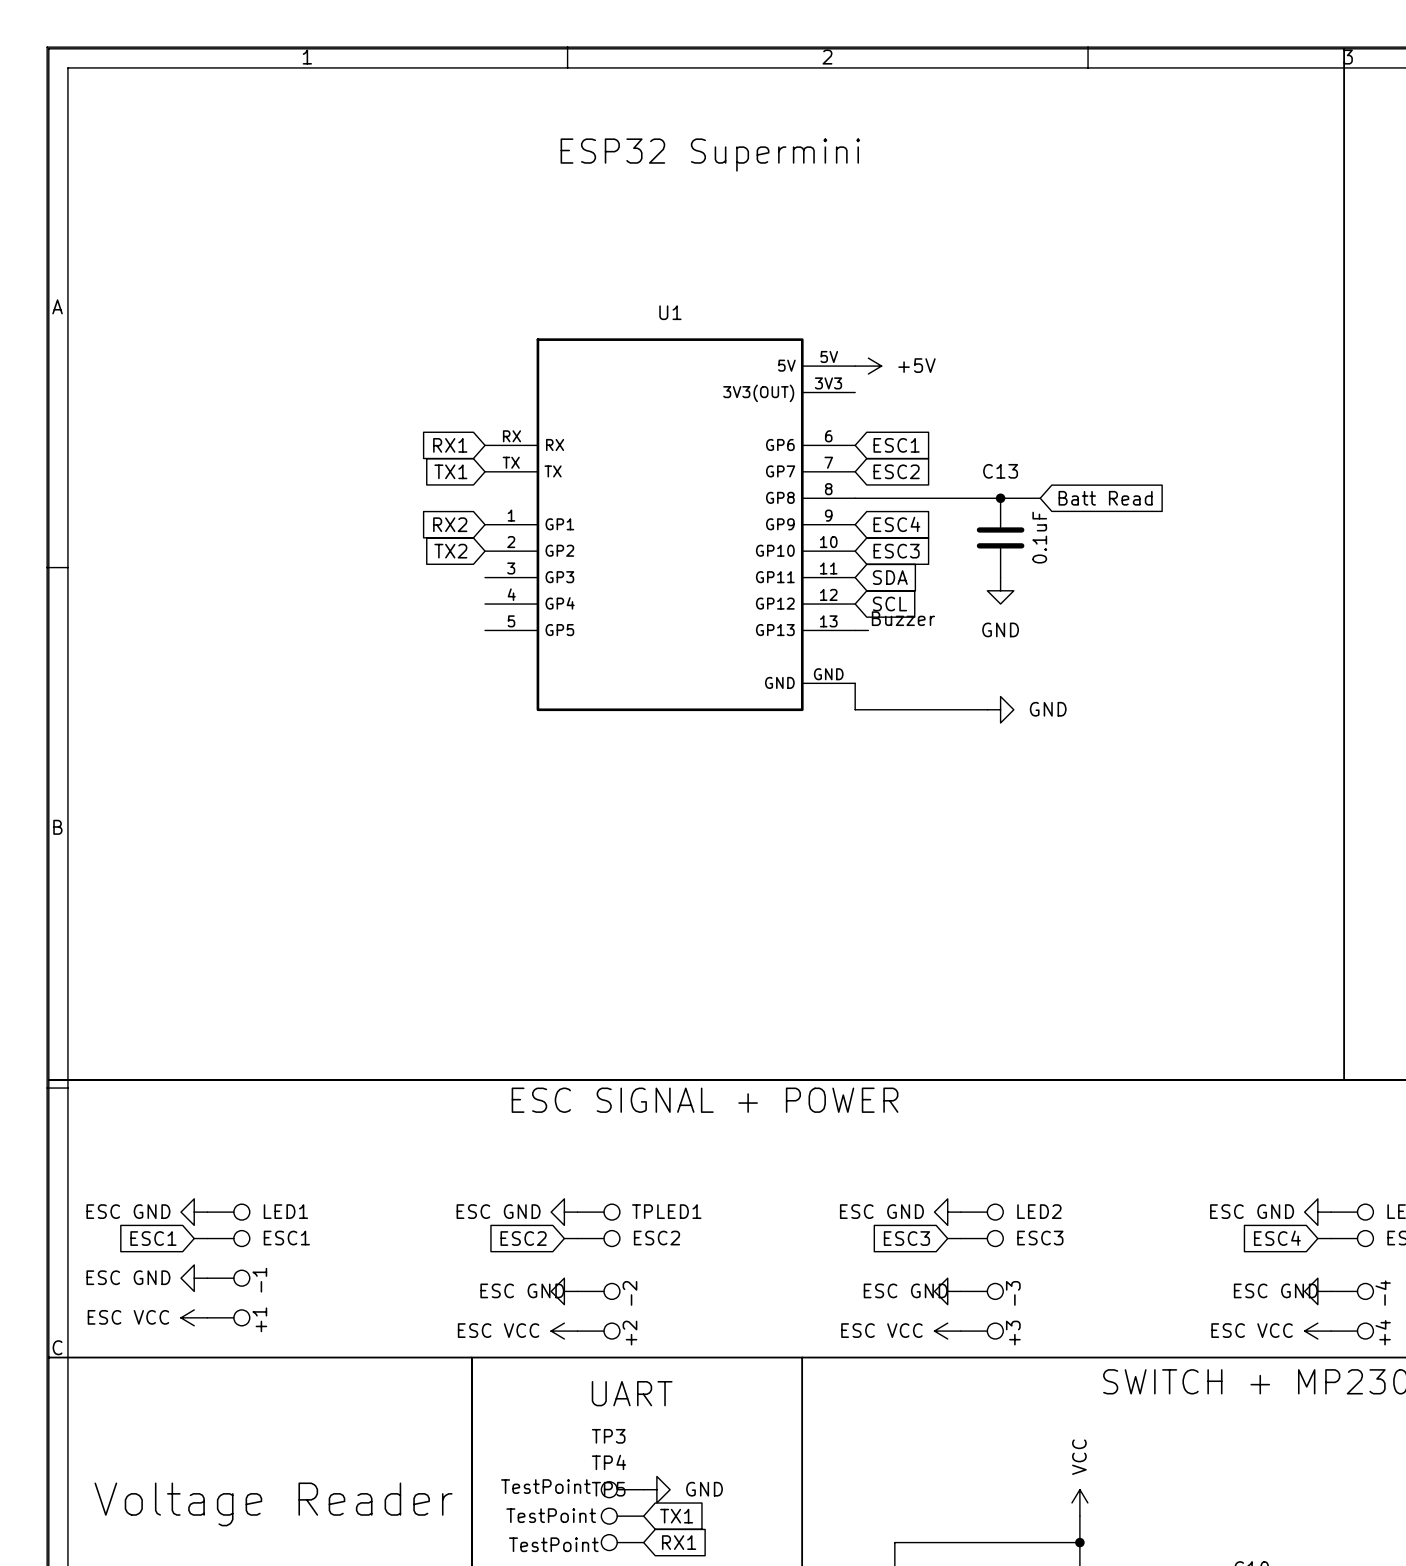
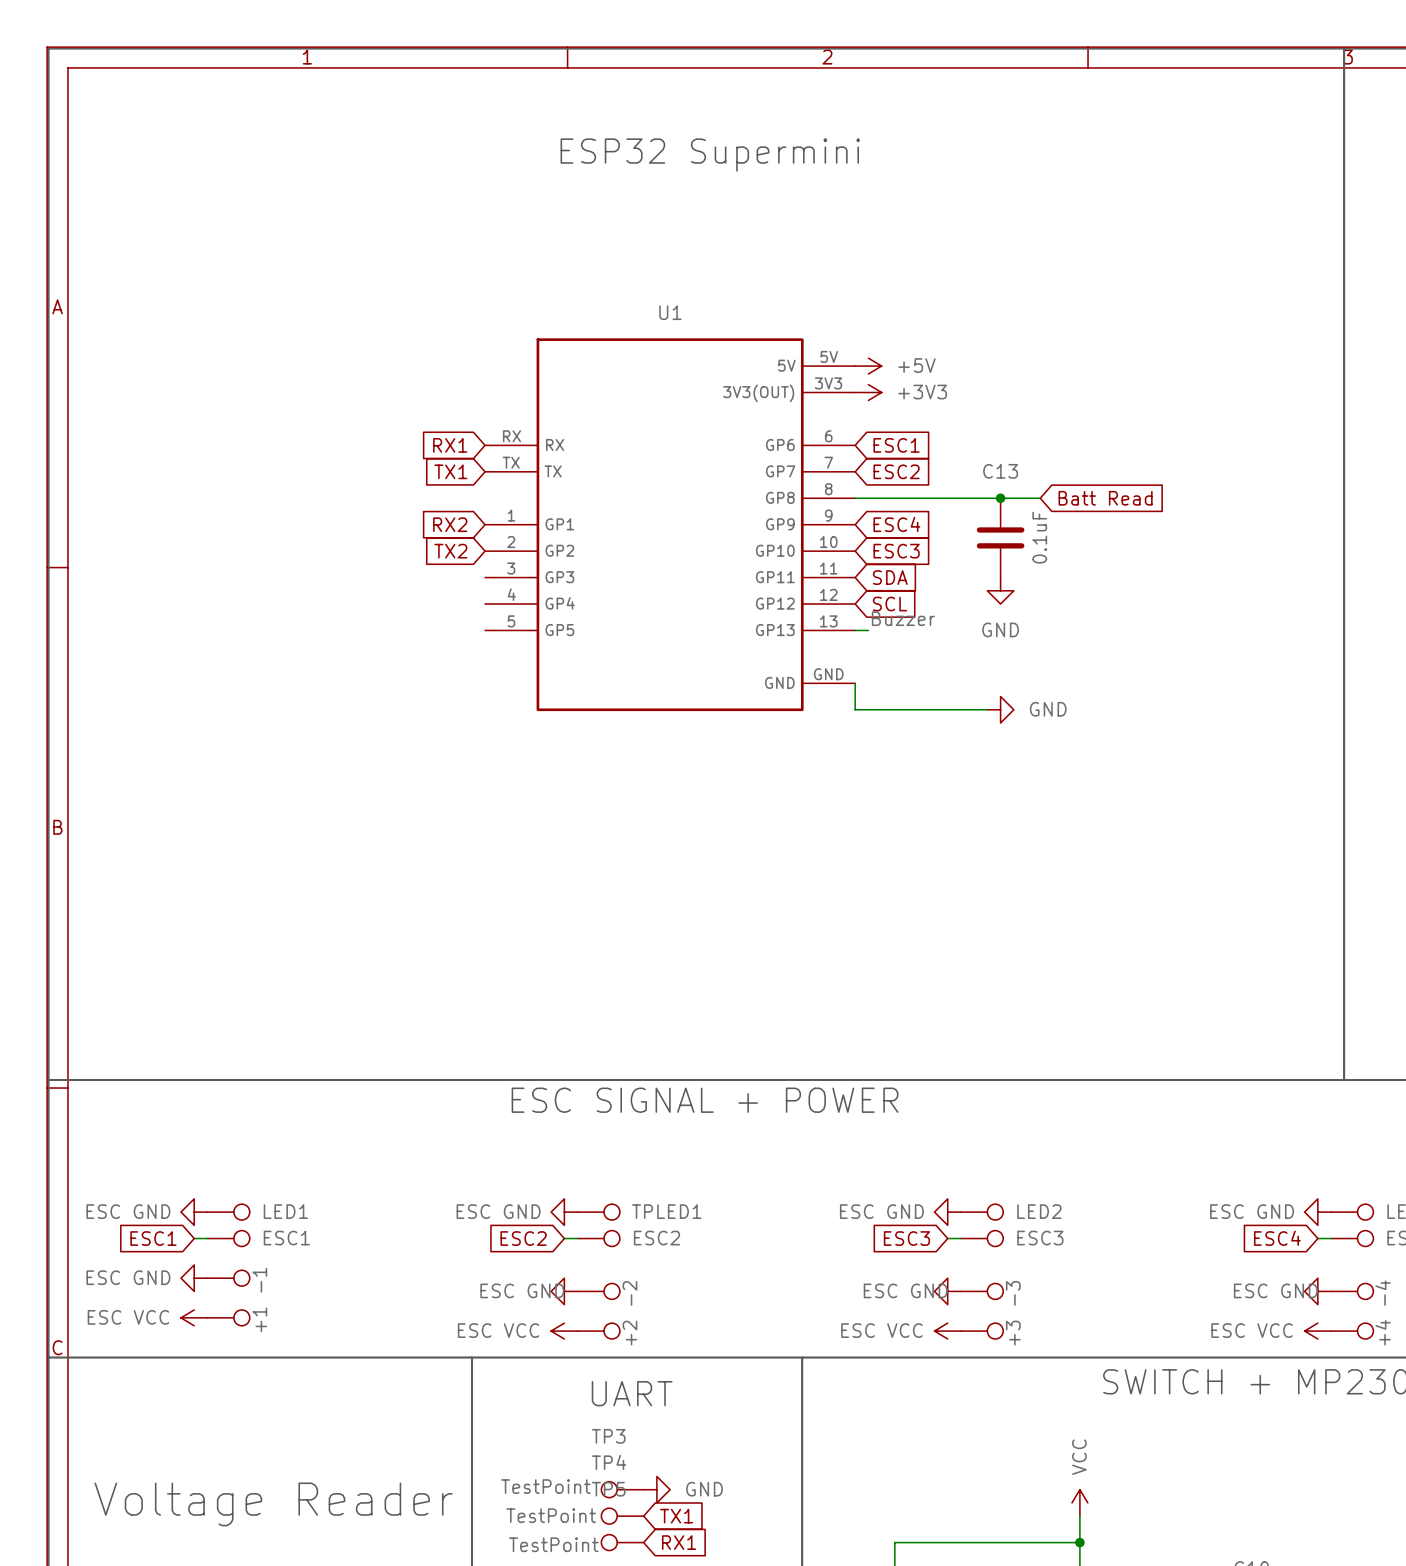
power symbol: none -> +3V3 (868, 392)

